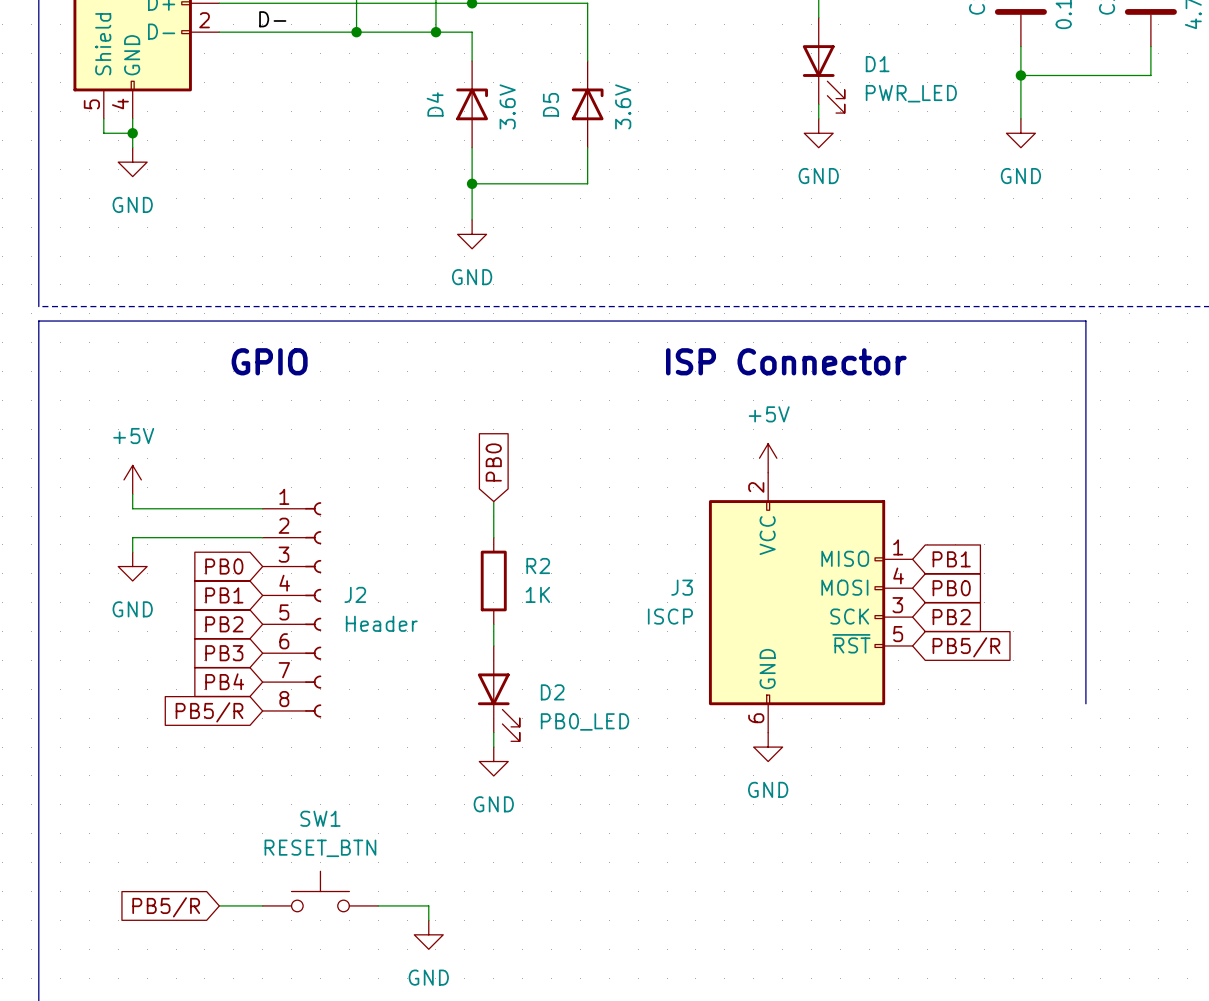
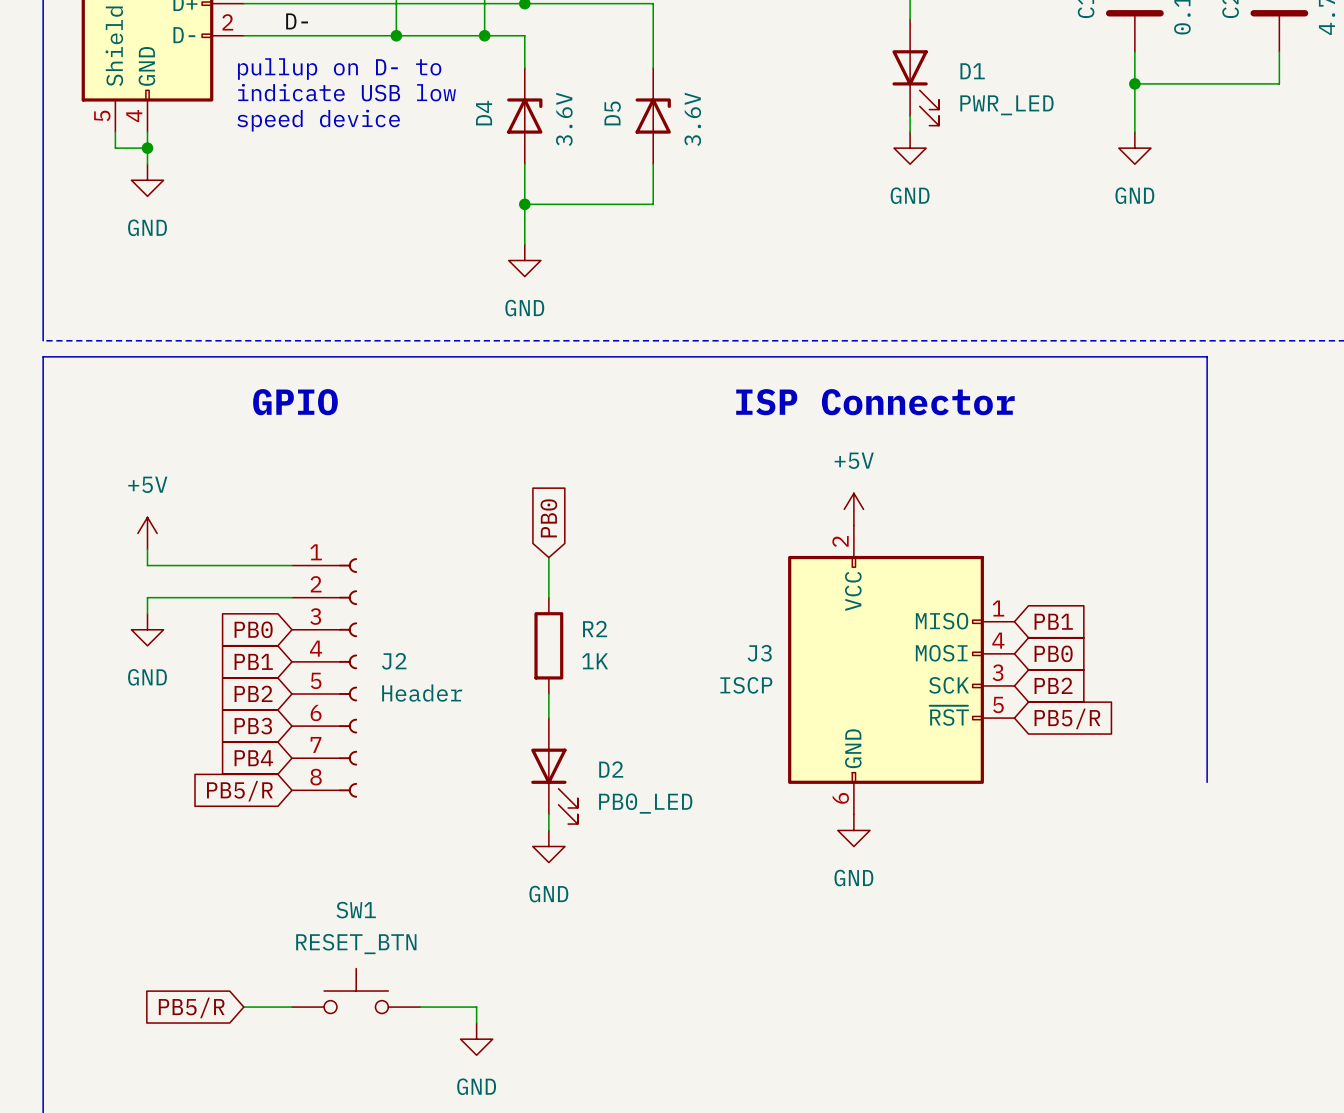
text: none -> pullup on D- to (339, 69)
text: none -> indicate USB low (347, 92)
text: none -> speed device (318, 120)

